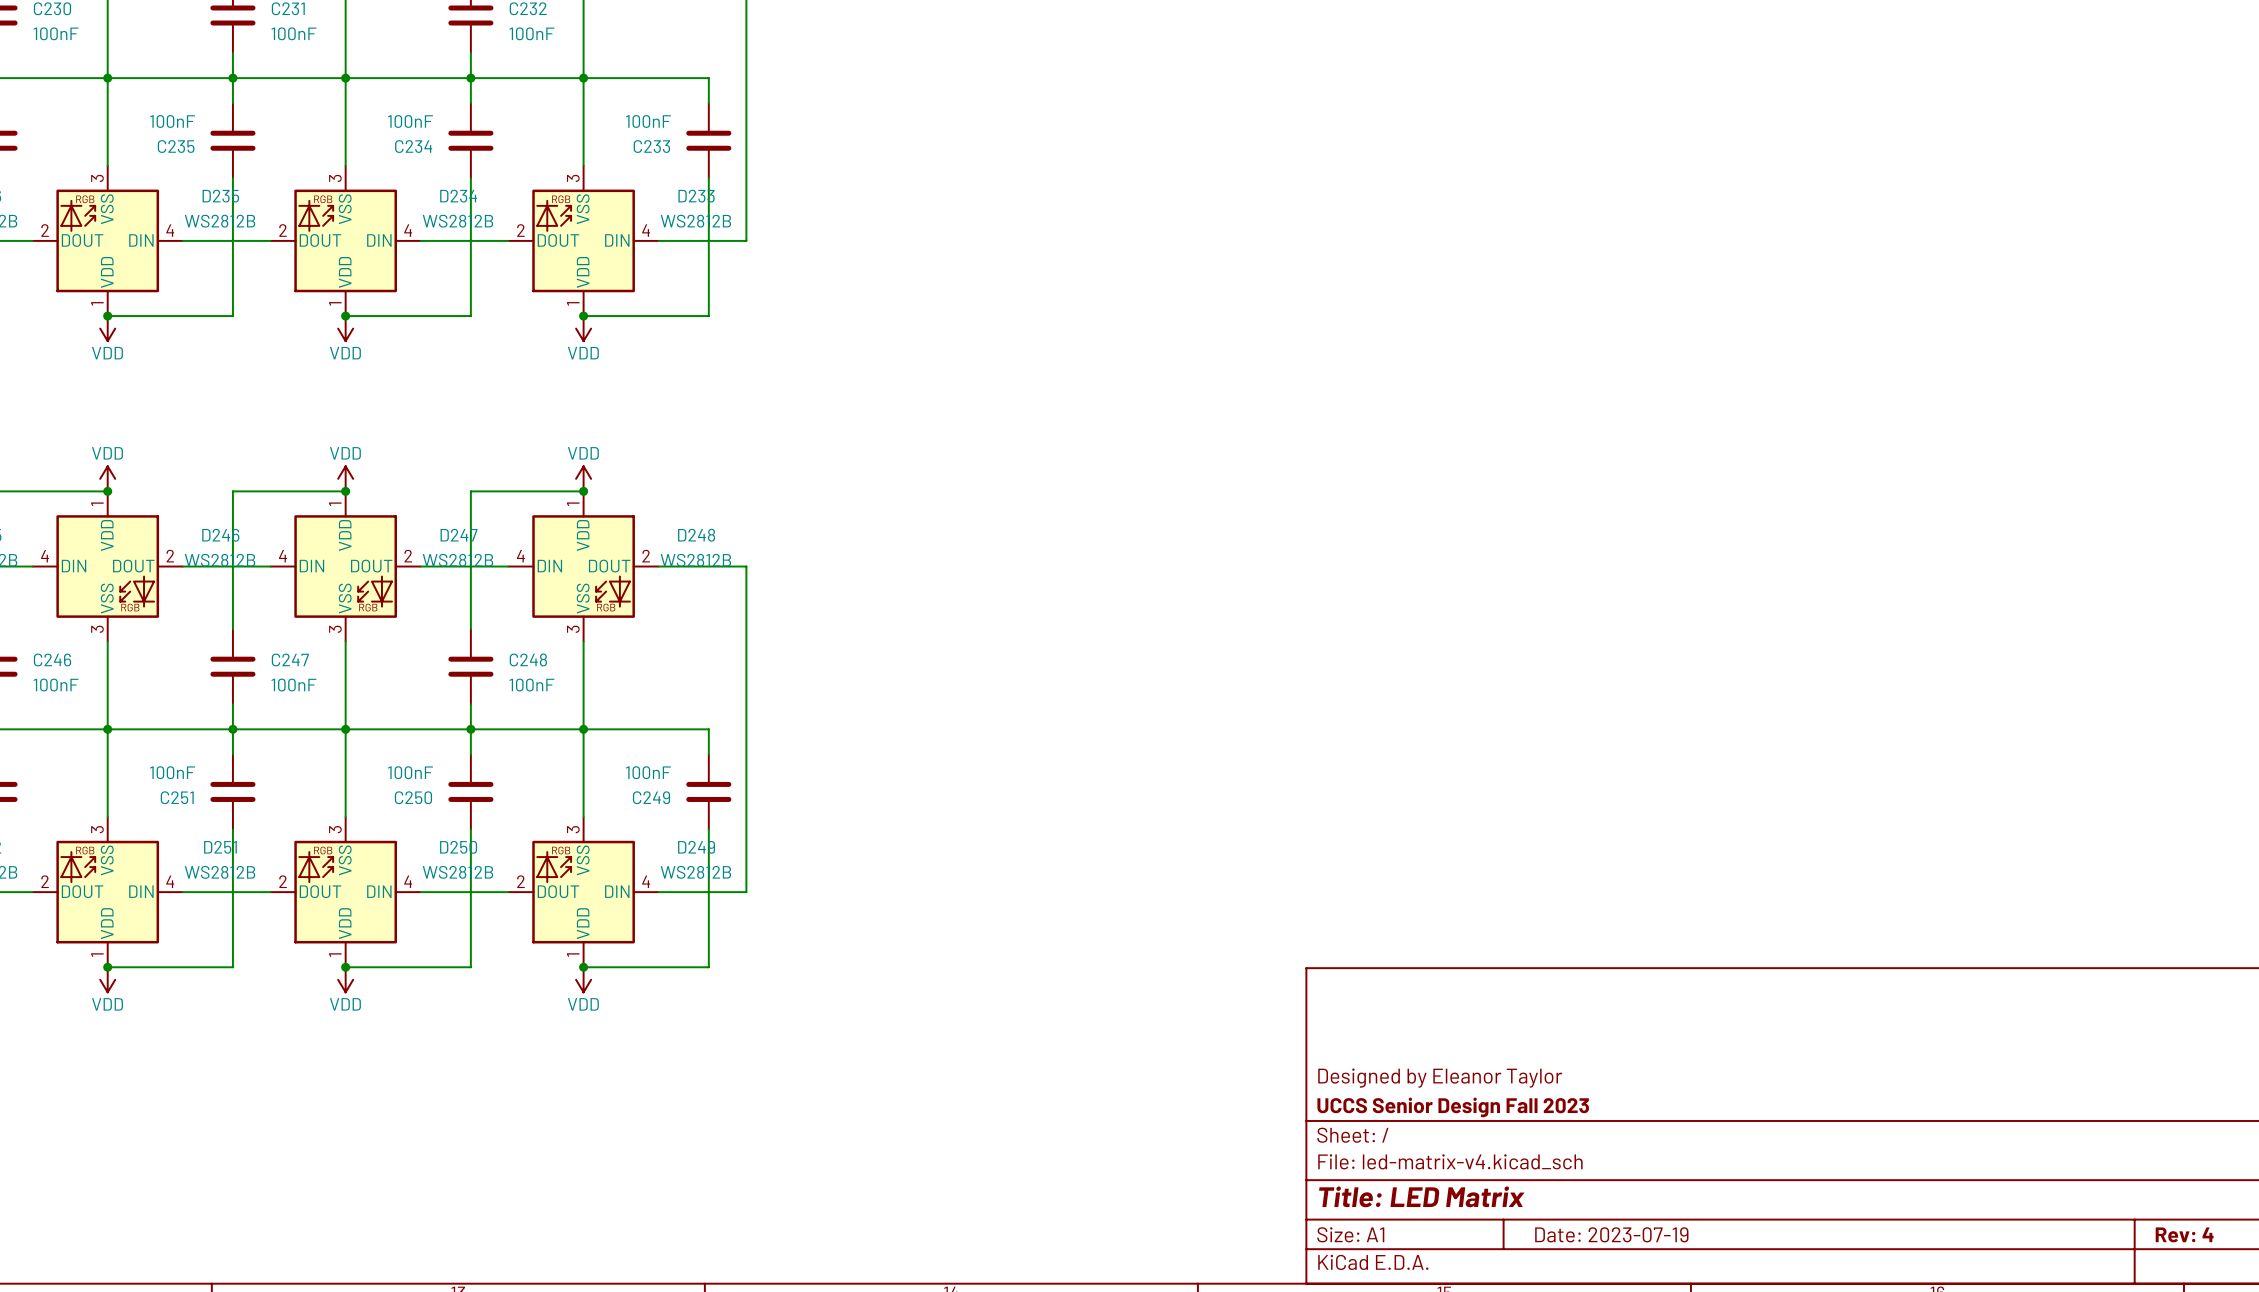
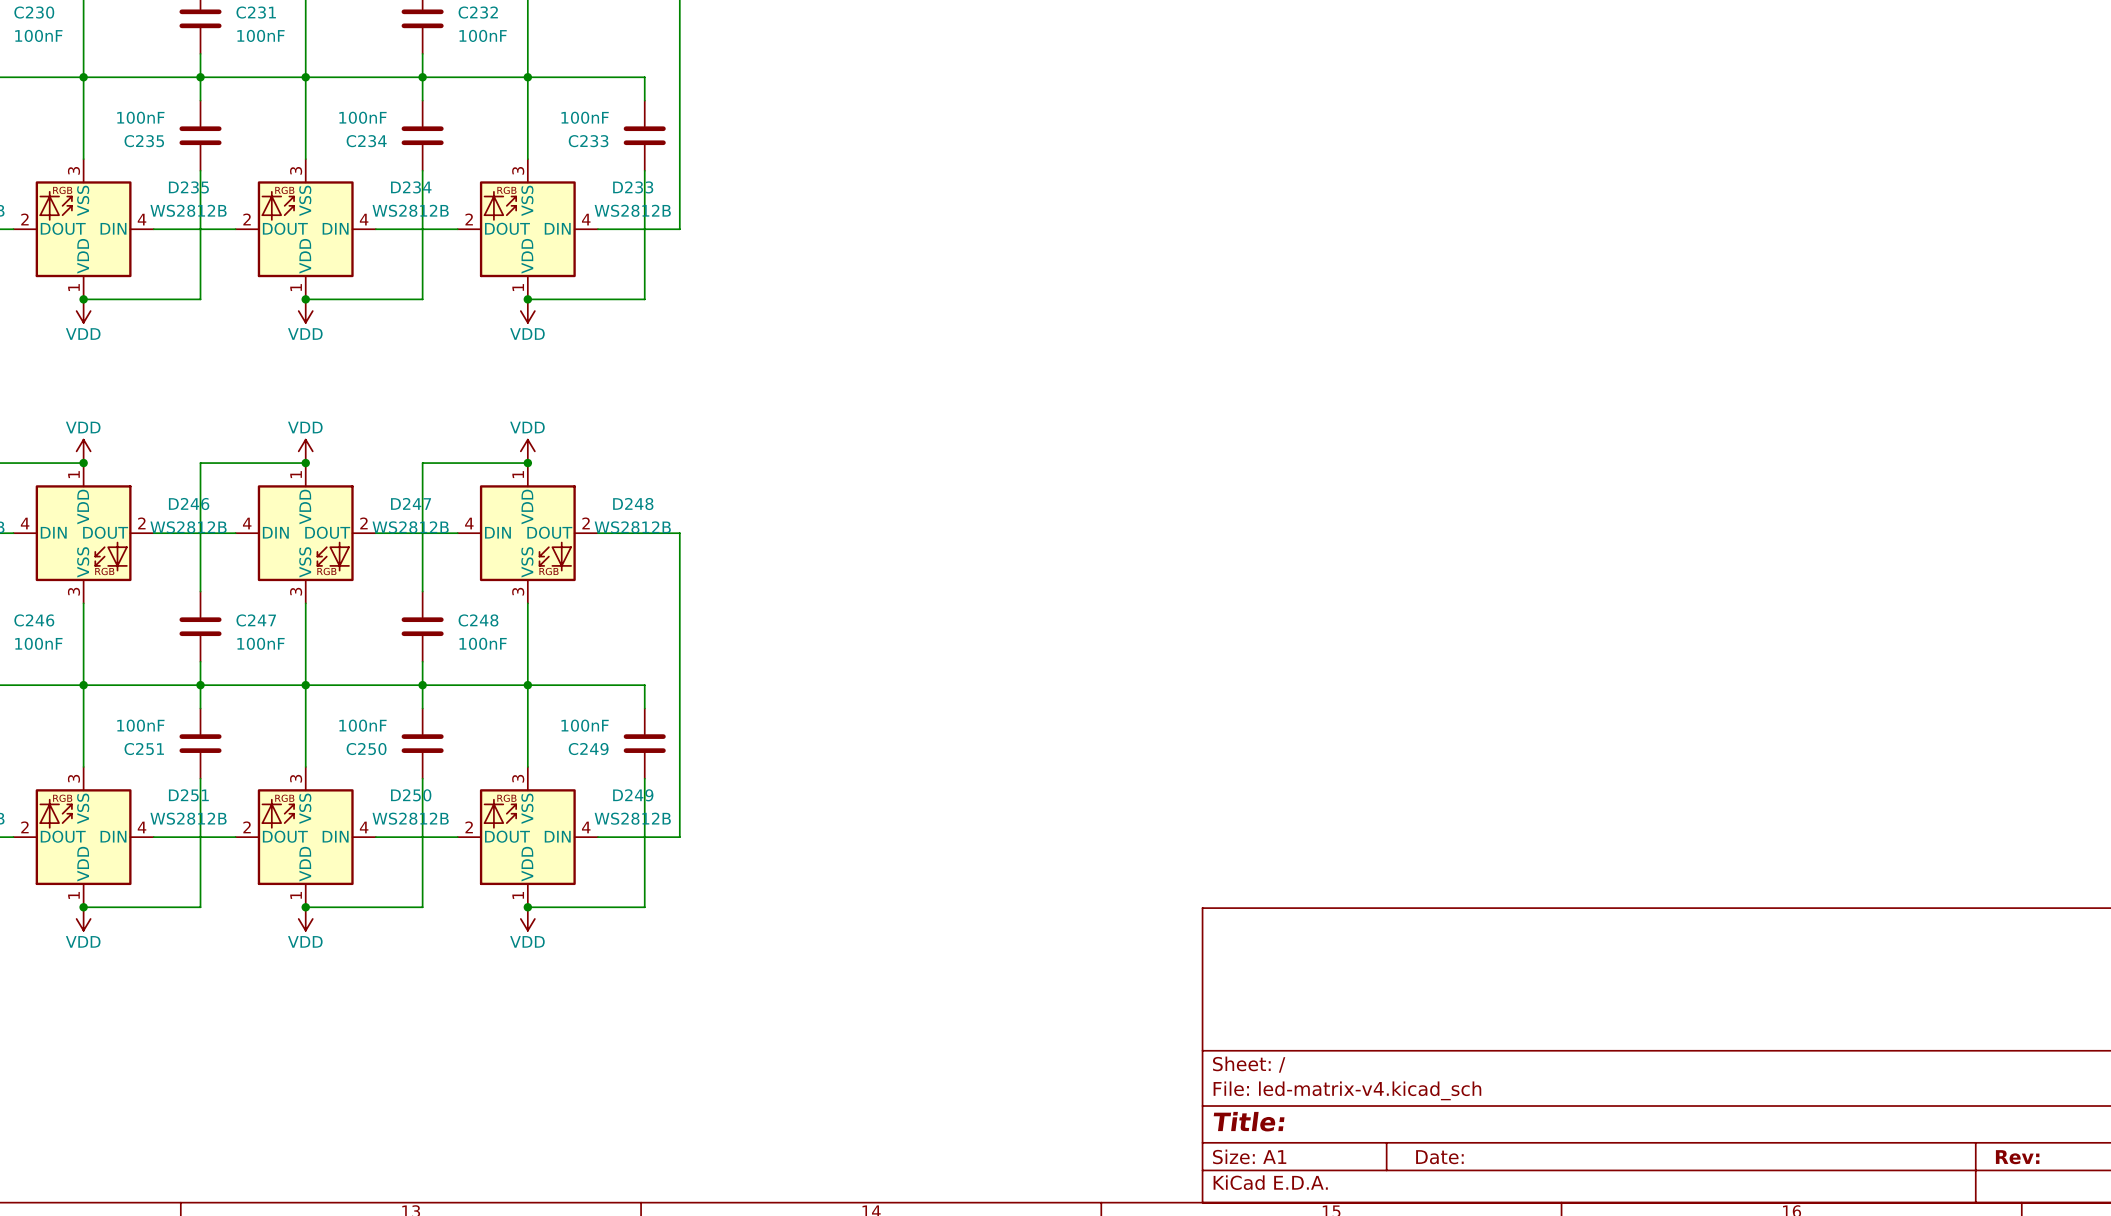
title block: Designed by Eleanor Taylor (1440, 1078) -> none
title block: UCCS Senior Design Fall 2023 (1453, 1107) -> none
title block: Title: LED Matrix (1421, 1196) -> Title: (1249, 1121)
title block: Date: 2023-07-19 (1611, 1234) -> Date: (1439, 1157)
title block: Rev: 4 (2184, 1234) -> Rev: (2017, 1157)

